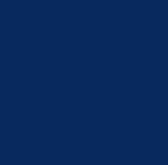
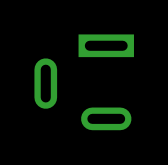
part: none -> (84, 82)

